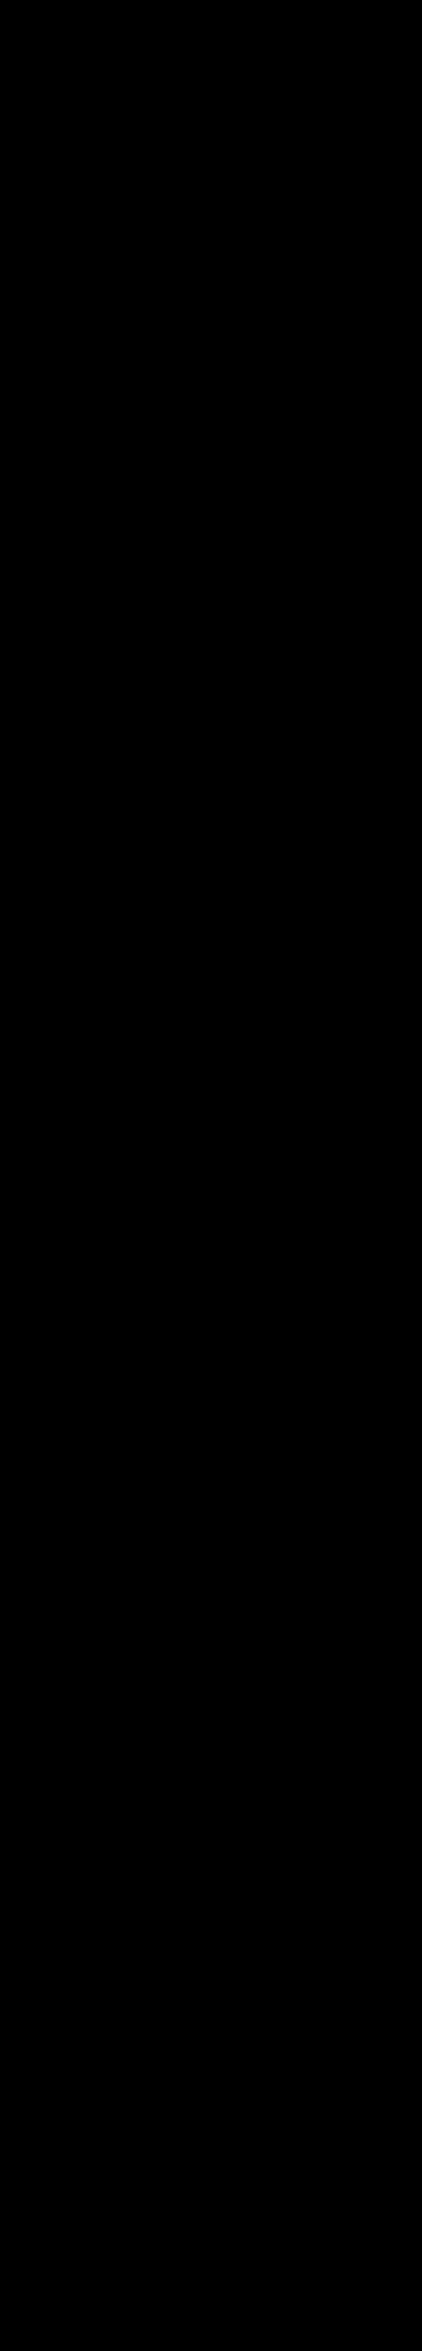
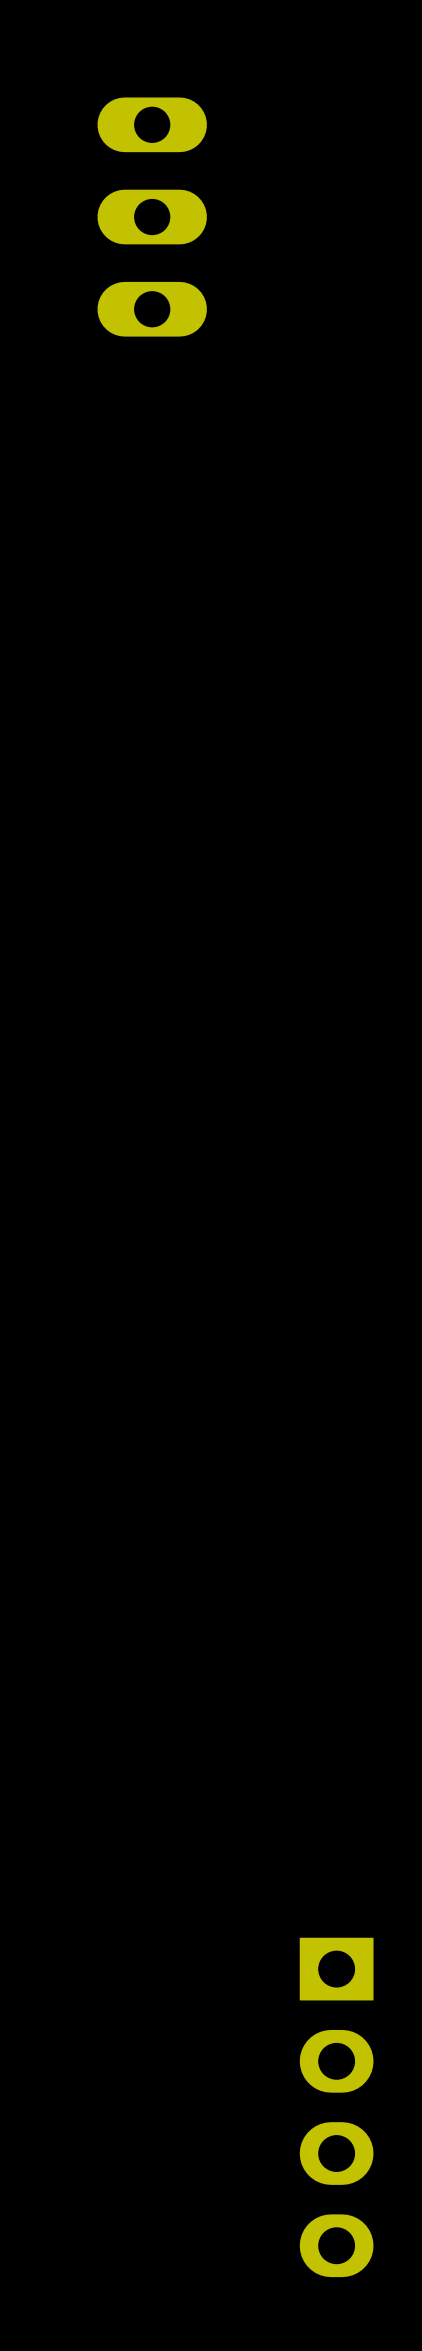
part: none -> (152, 217)
part: none -> (336, 2107)

